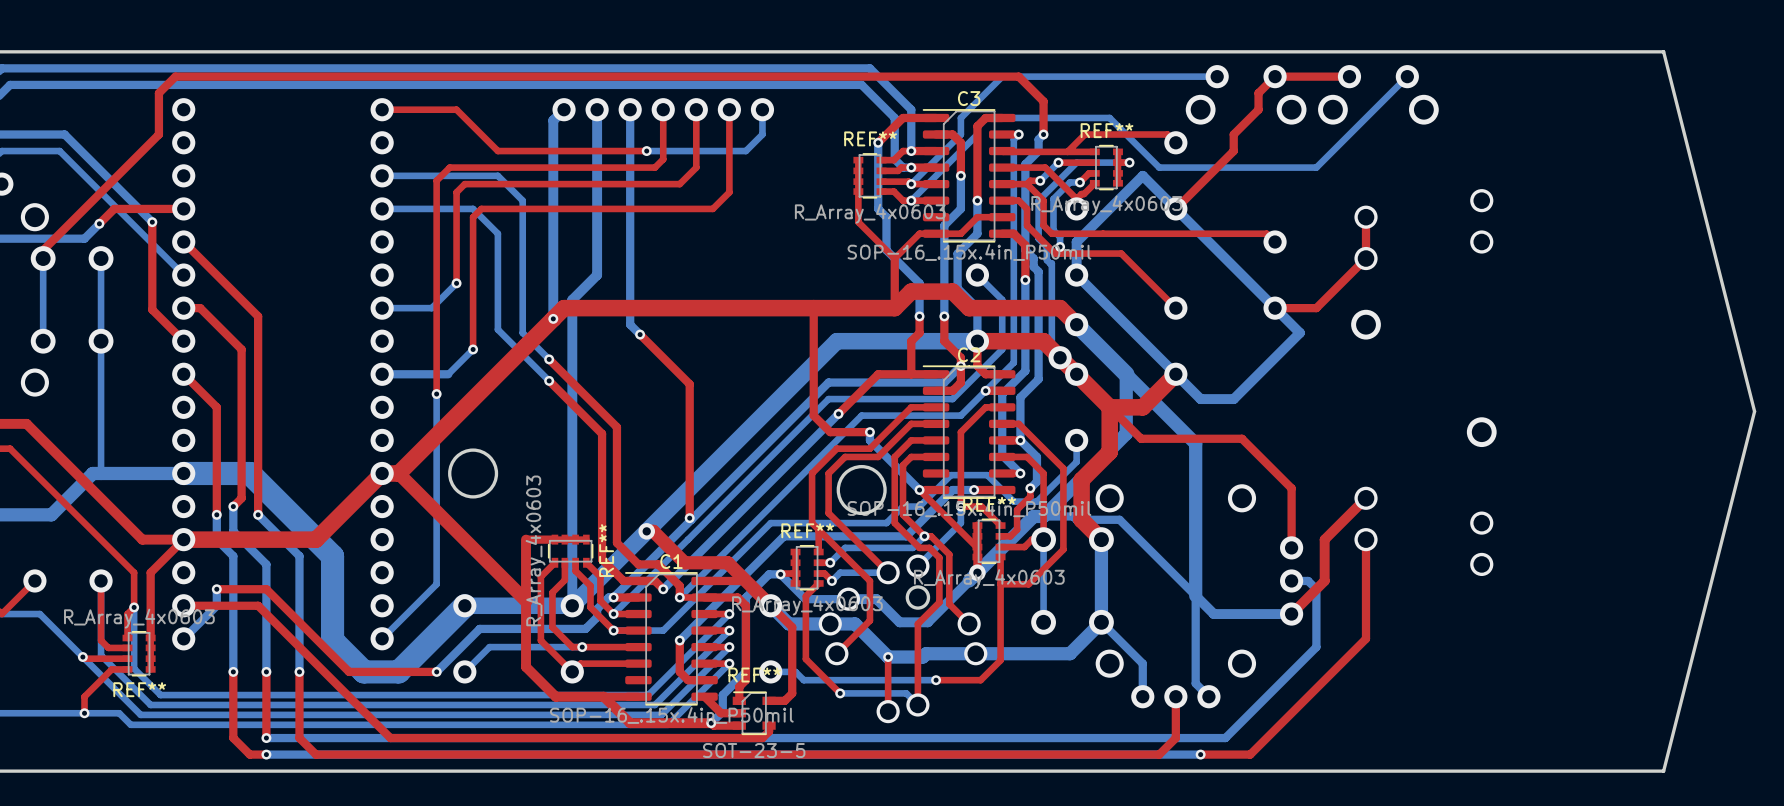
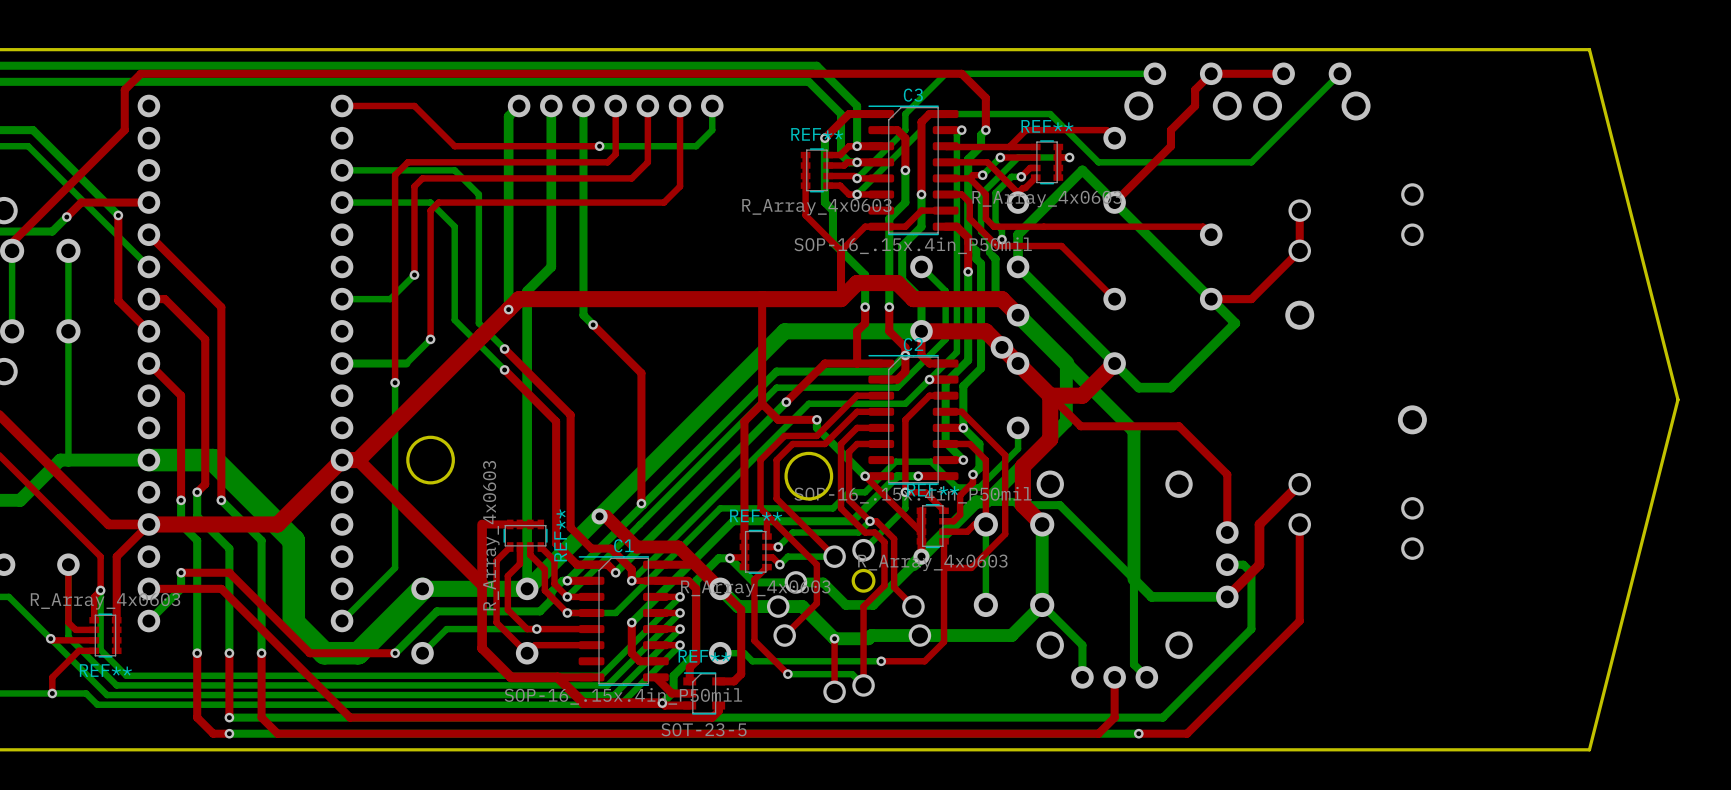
bottom track: (1050, 263) (1051, 263) (1051, 349) (1060, 357) -> (992, 255) (995, 258) (995, 292) (1018, 315)
top track: none -> (762, 403) (744, 421) (744, 536)

